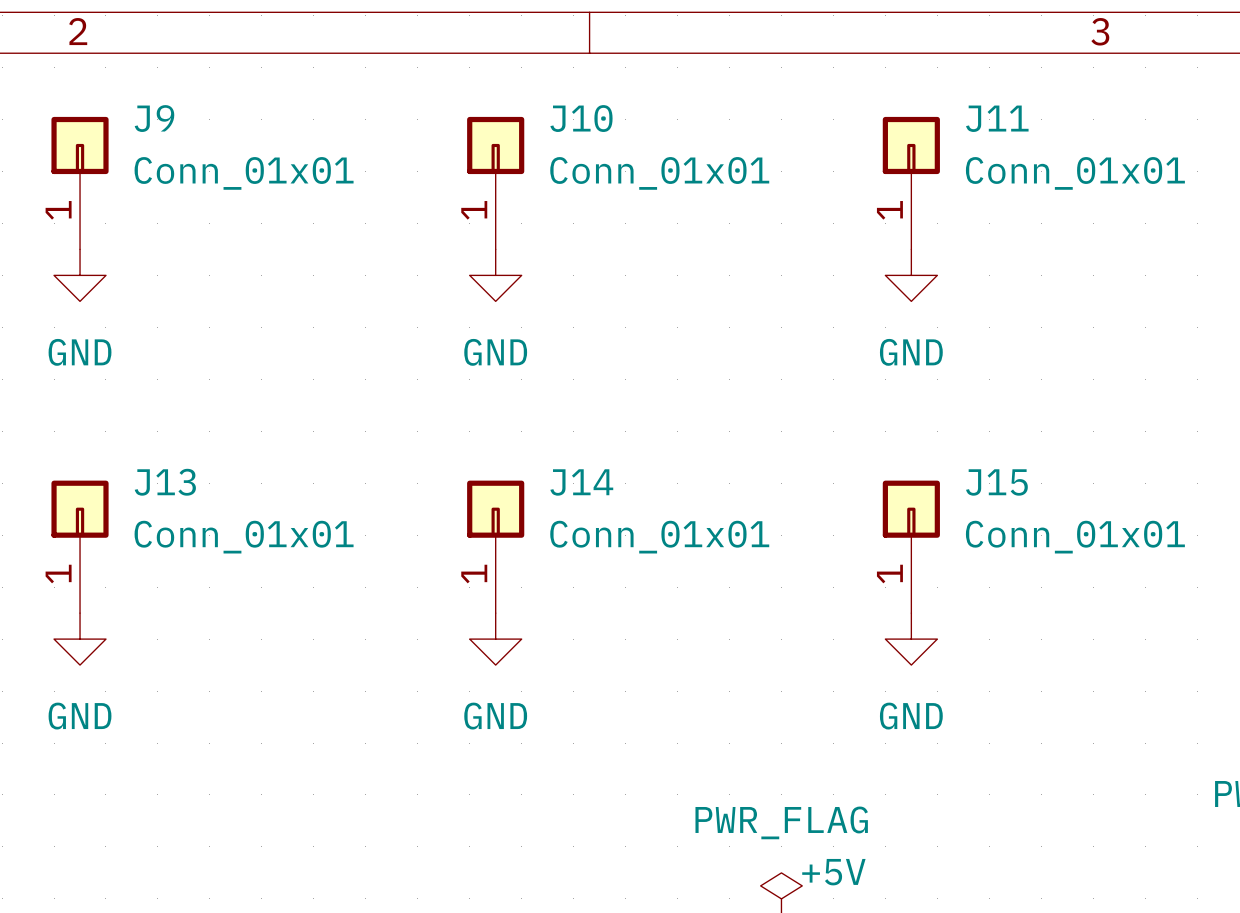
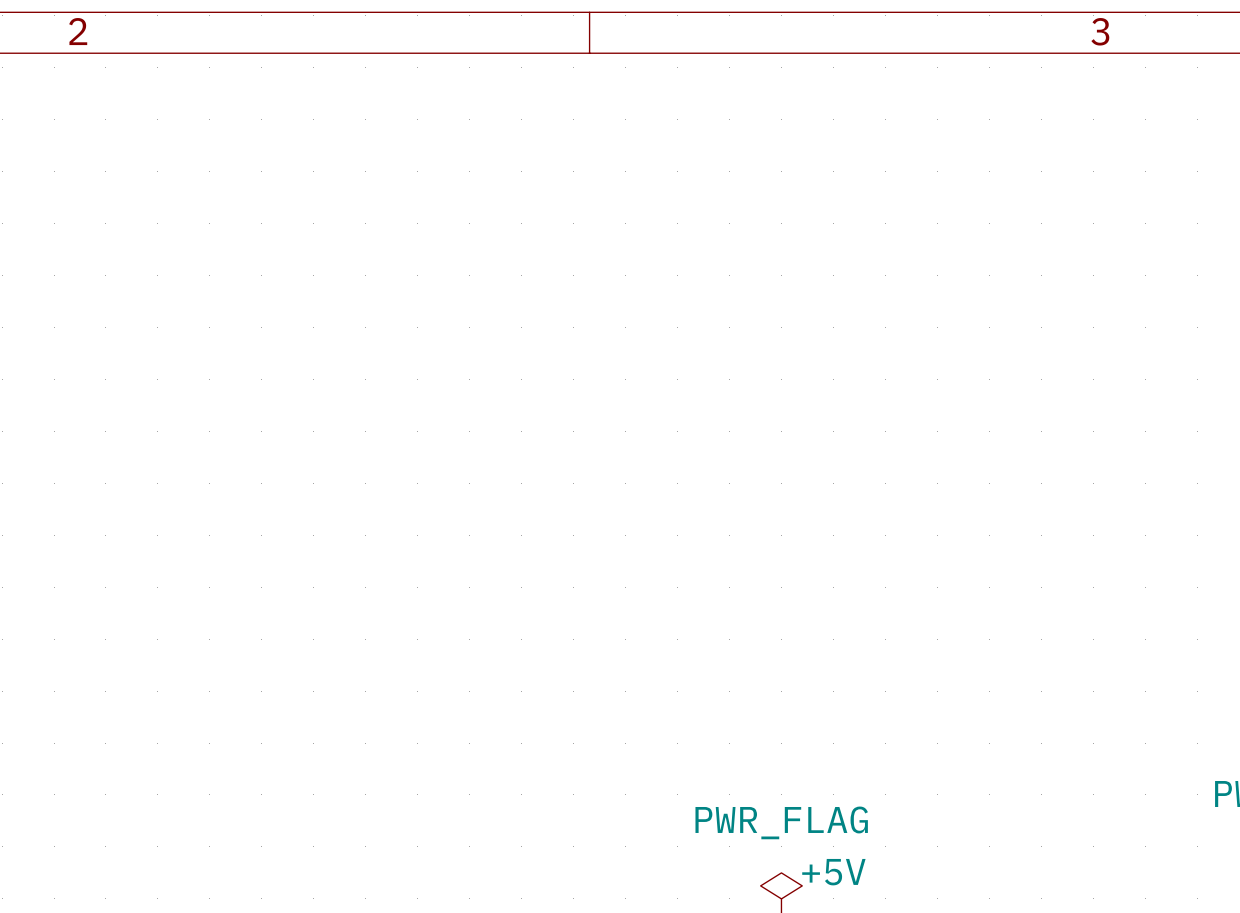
J9: Conn_01x01 (80, 183) -> none
J10: Conn_01x01 (495, 183) -> none
J11: Conn_01x01 (911, 183) -> none
power symbol: GND (80, 275) -> none
power symbol: GND (495, 275) -> none
power symbol: GND (911, 275) -> none
J13: Conn_01x01 (80, 546) -> none
J14: Conn_01x01 (495, 546) -> none
J15: Conn_01x01 (911, 546) -> none
power symbol: GND (80, 639) -> none
power symbol: GND (495, 639) -> none
power symbol: GND (911, 639) -> none

